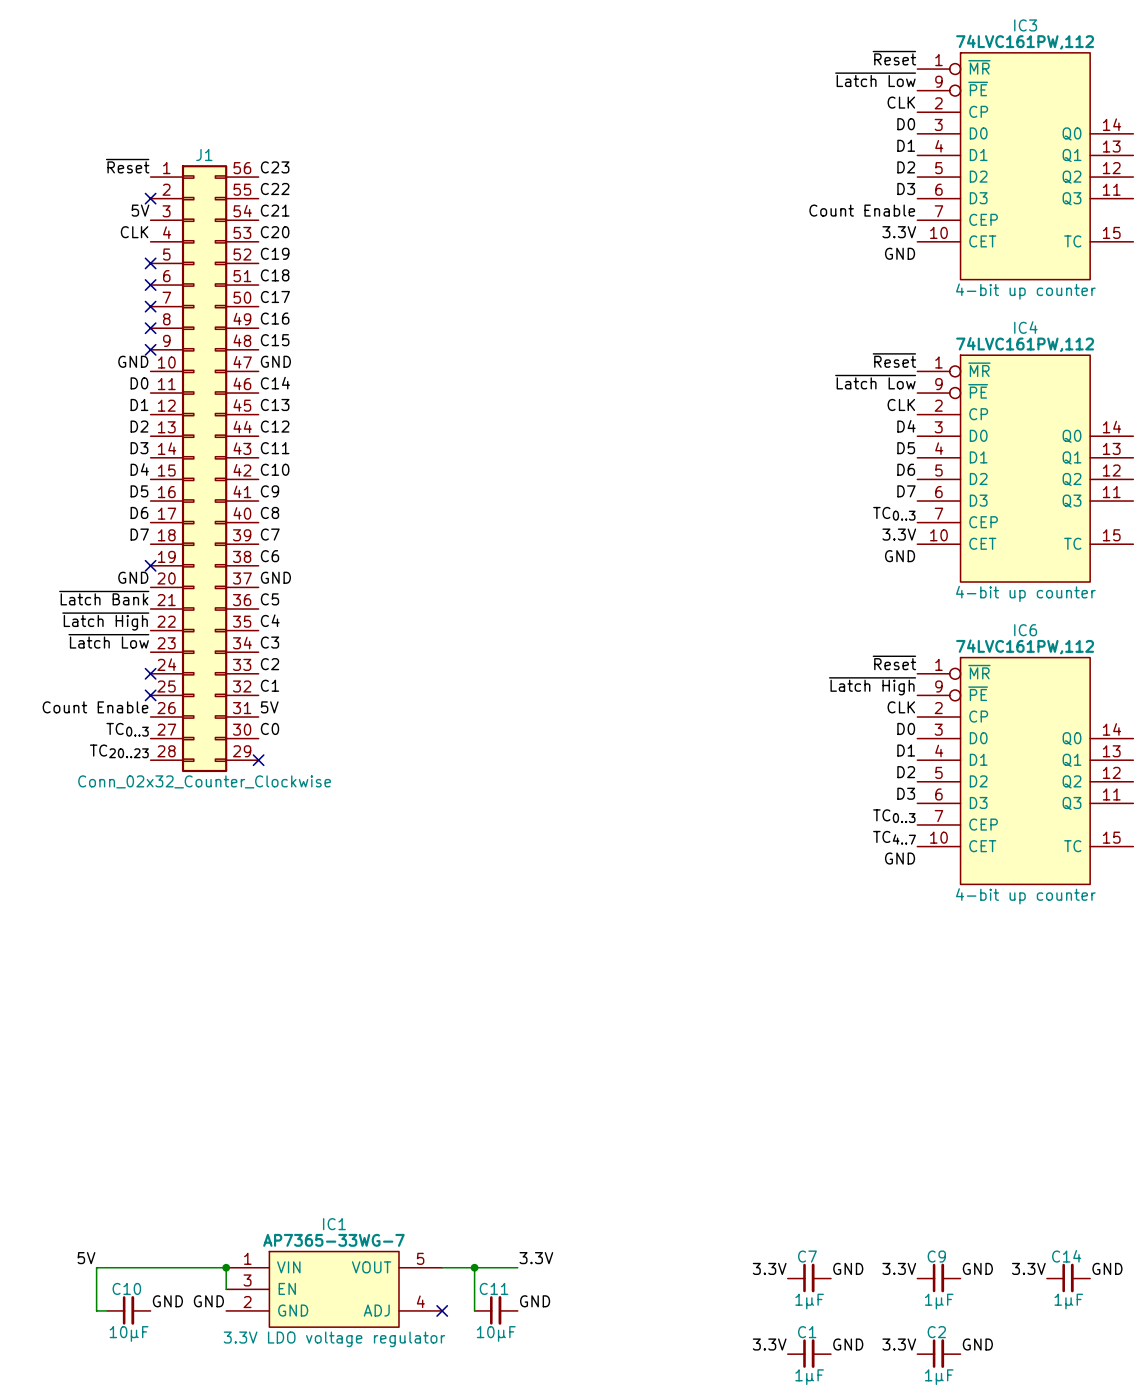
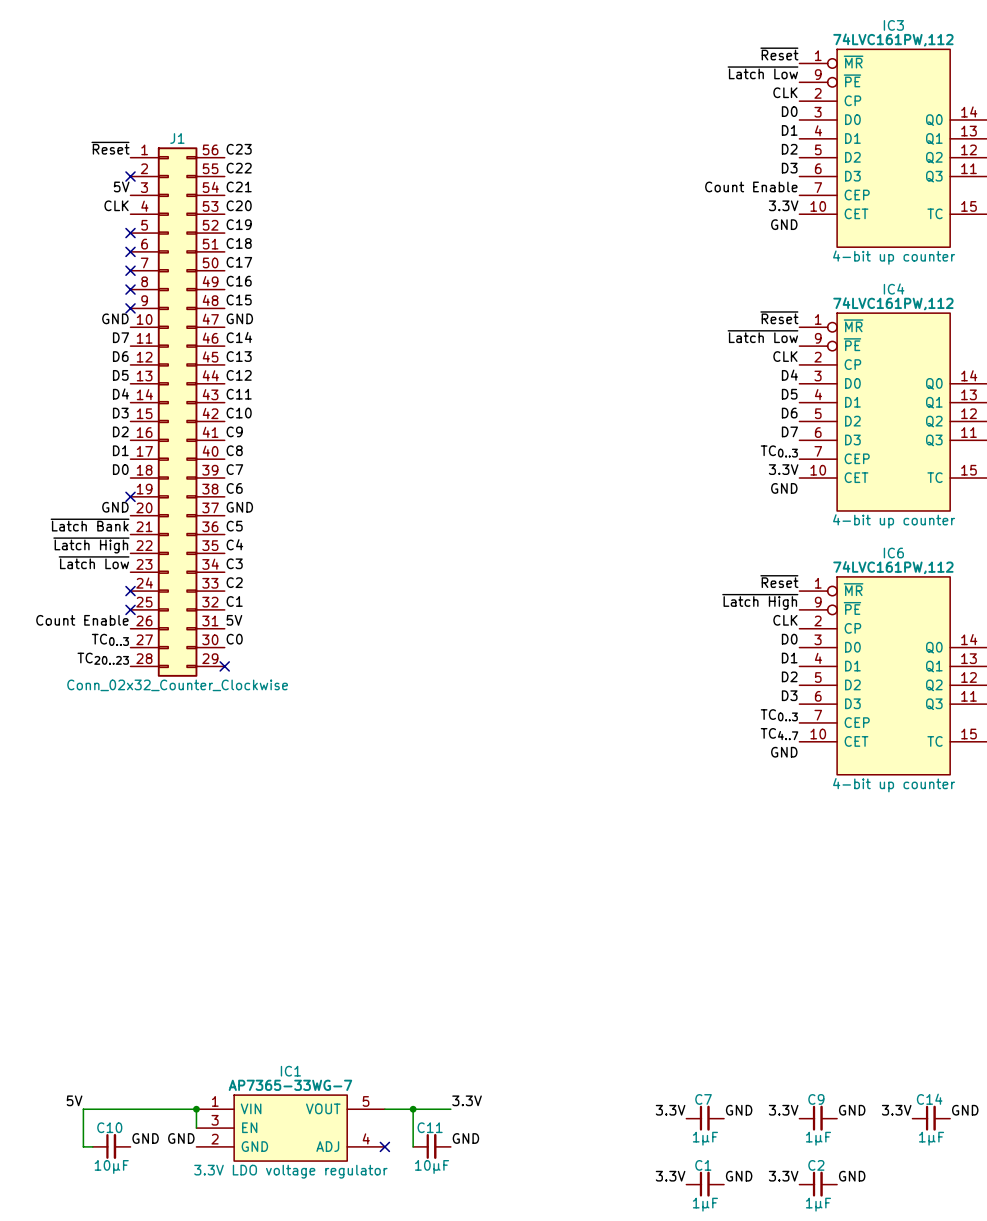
label: D0 (139, 383) -> D7 (121, 337)
label: D1 (139, 404) -> D6 (120, 356)
label: D2 (139, 426) -> D5 (120, 375)
label: D3 (139, 448) -> D4 (121, 394)
label: D4 (139, 469) -> D3 (120, 413)
label: D5 (139, 491) -> D2 (120, 431)
label: D6 (139, 512) -> D1 (120, 450)
label: D7 (139, 534) -> D0 (120, 469)

